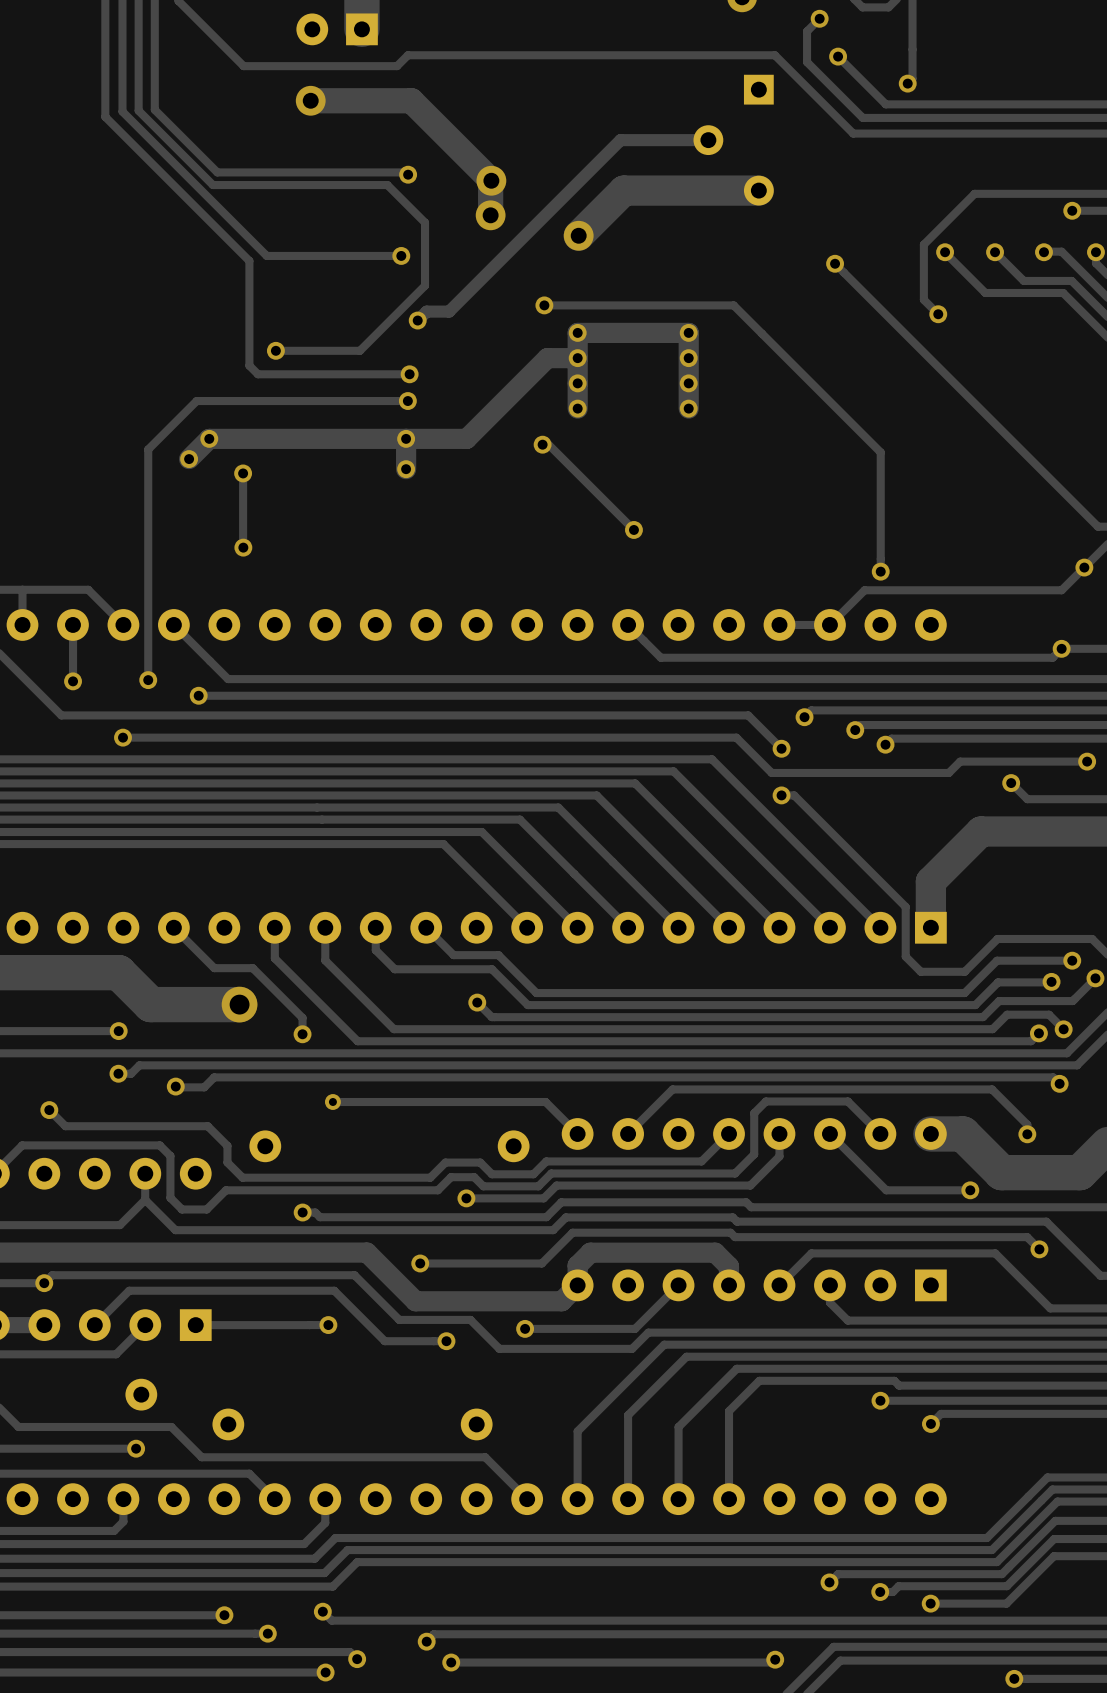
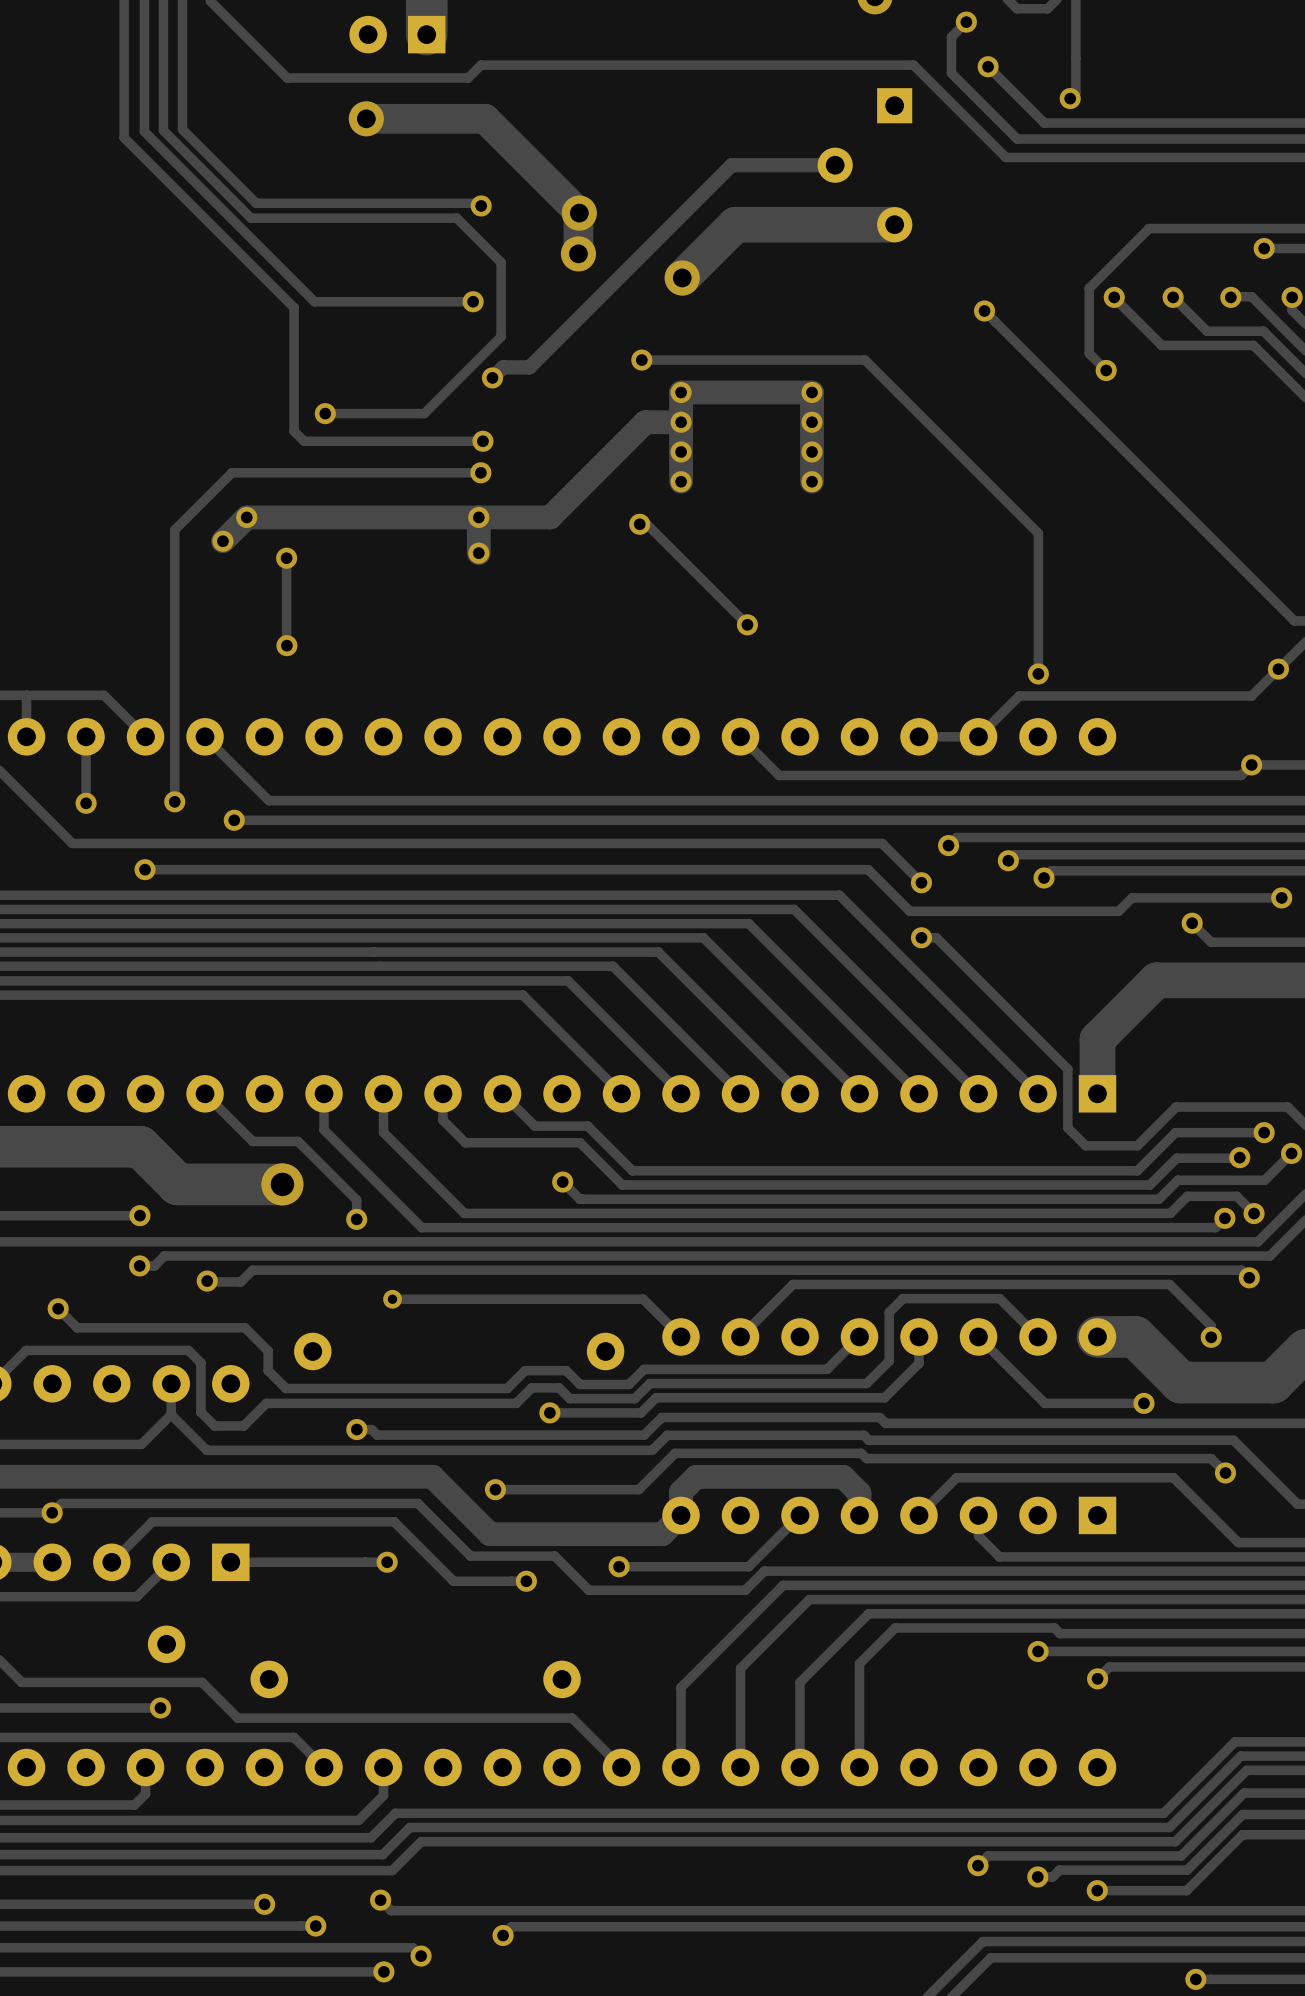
track: (775, 1659) (772, 1662) (451, 1662) -> none
via: (775, 1659) -> none
via: (451, 1662) -> none

